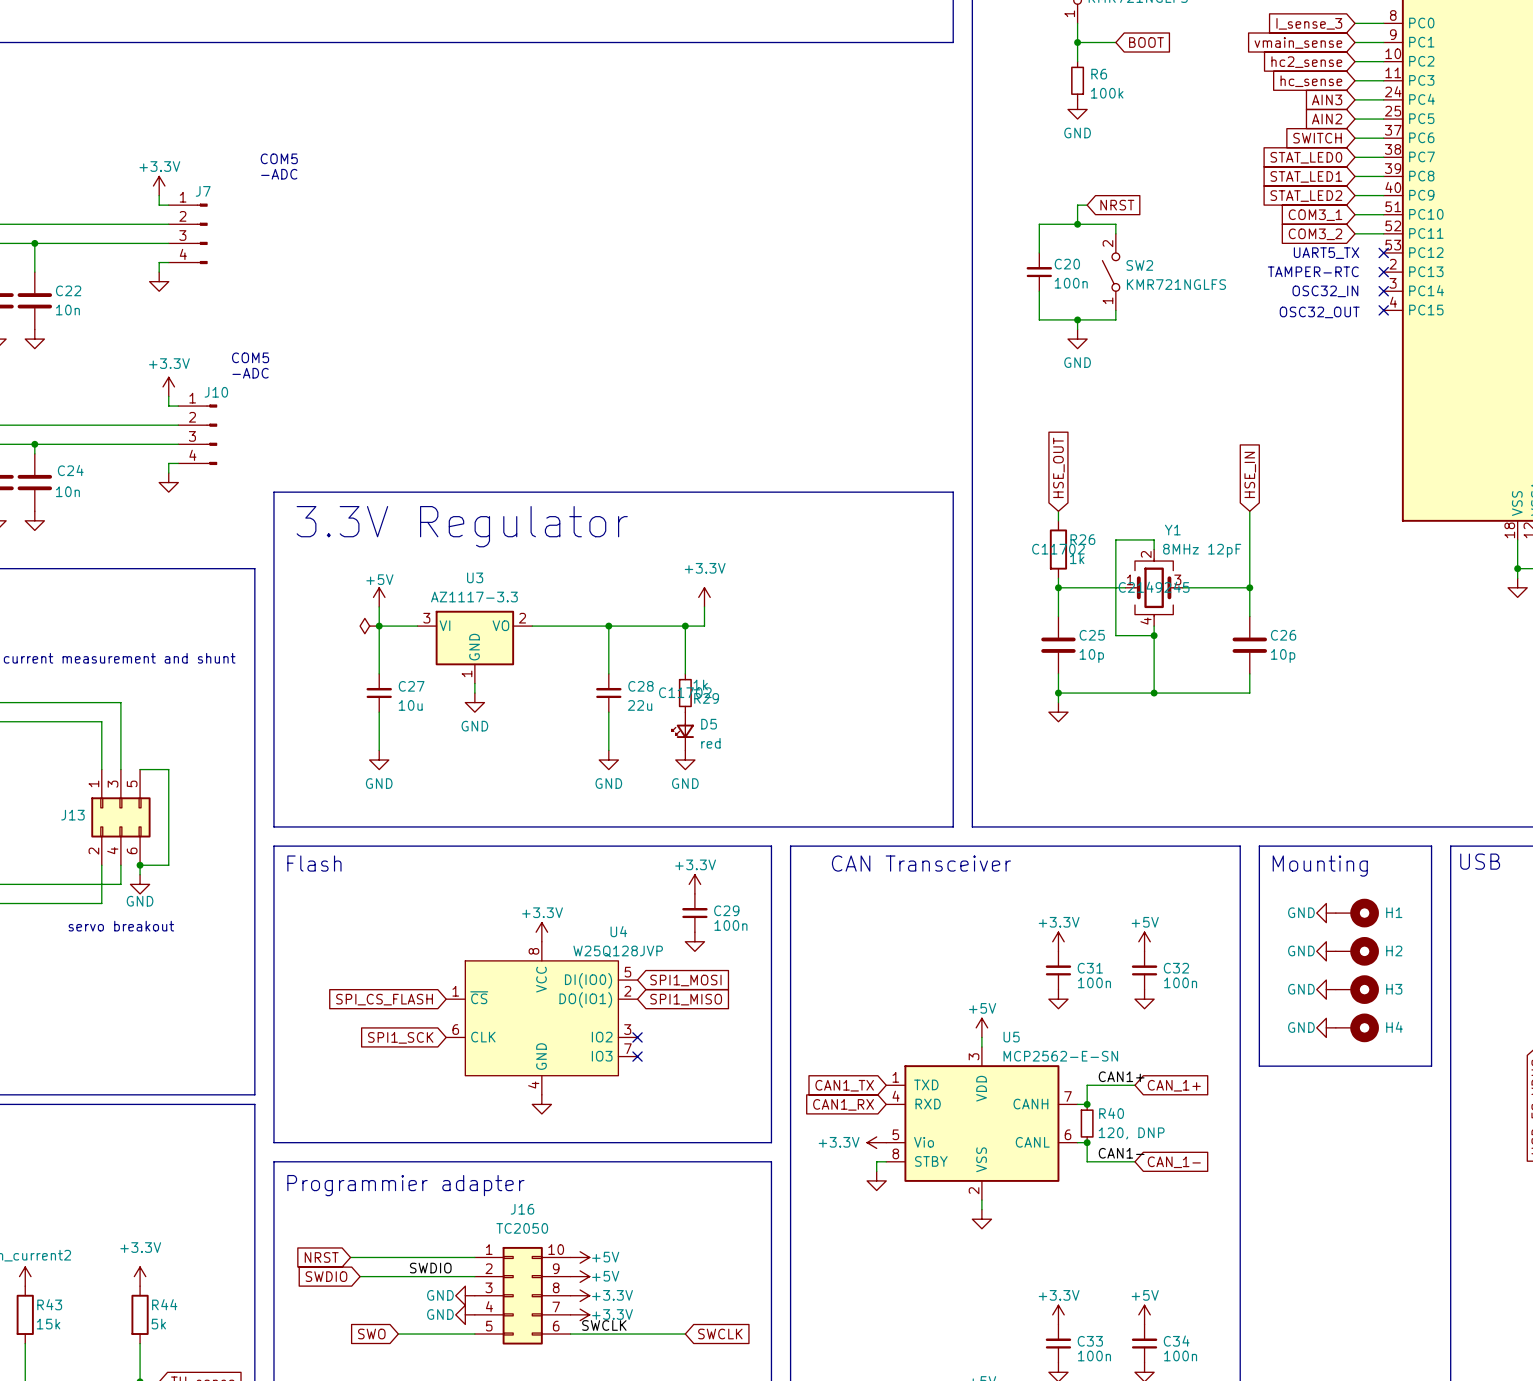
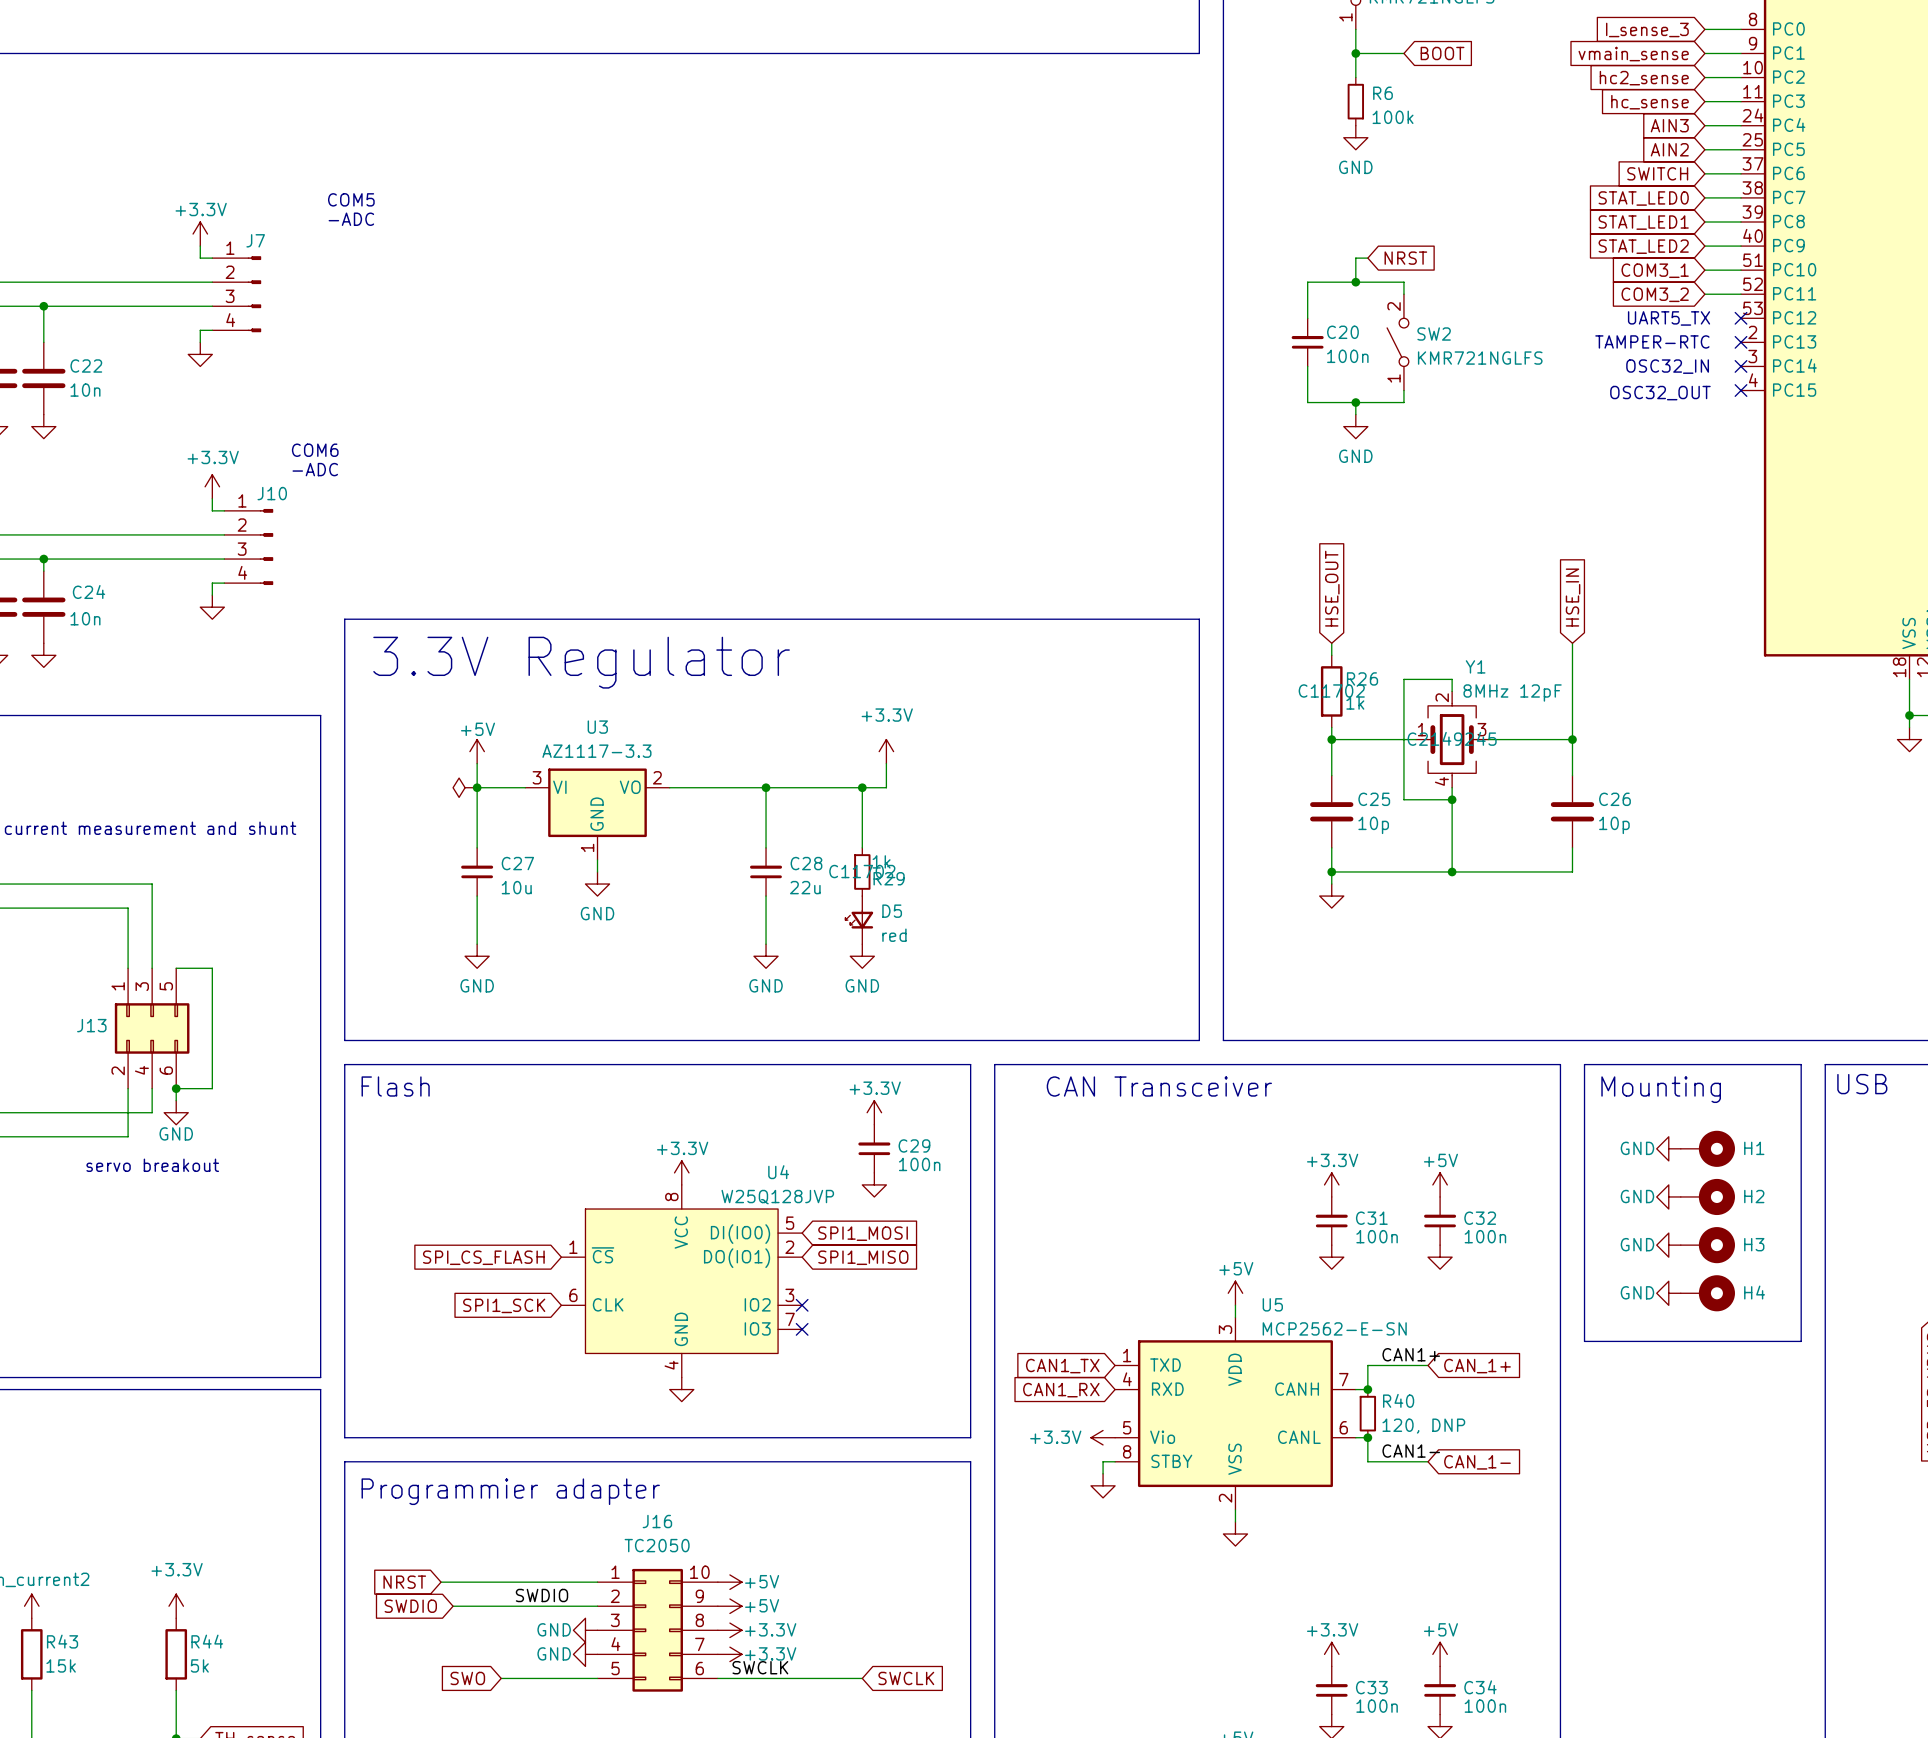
text: COM5 (250, 357) -> COM6 (315, 450)

